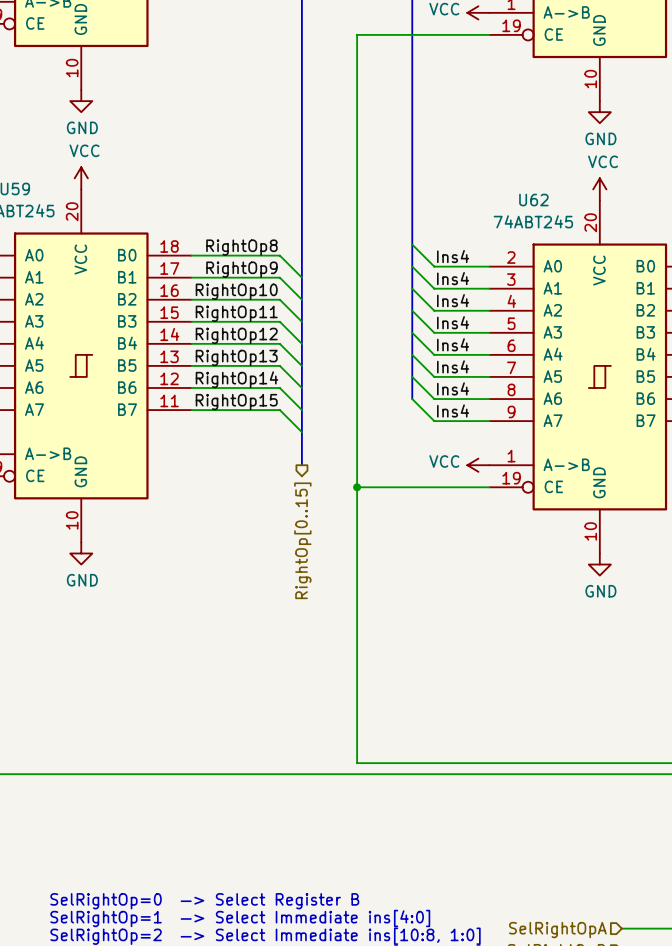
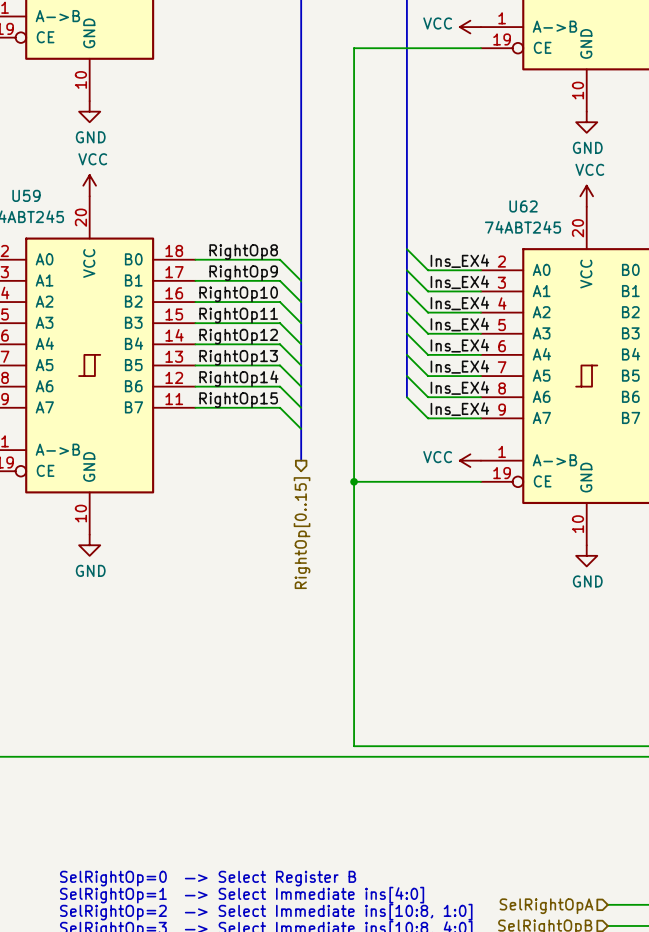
label: Ins4 (453, 256) -> Ins_EX4 (459, 261)
label: Ins4 (453, 278) -> Ins_EX4 (459, 282)
label: Ins4 (453, 300) -> Ins_EX4 (459, 303)
label: Ins4 (453, 322) -> Ins_EX4 (459, 324)
label: Ins4 (453, 344) -> Ins_EX4 (459, 345)
label: Ins4 (453, 366) -> Ins_EX4 (459, 366)
label: Ins4 (453, 388) -> Ins_EX4 (459, 388)
label: Ins4 (453, 410) -> Ins_EX4 (459, 409)

